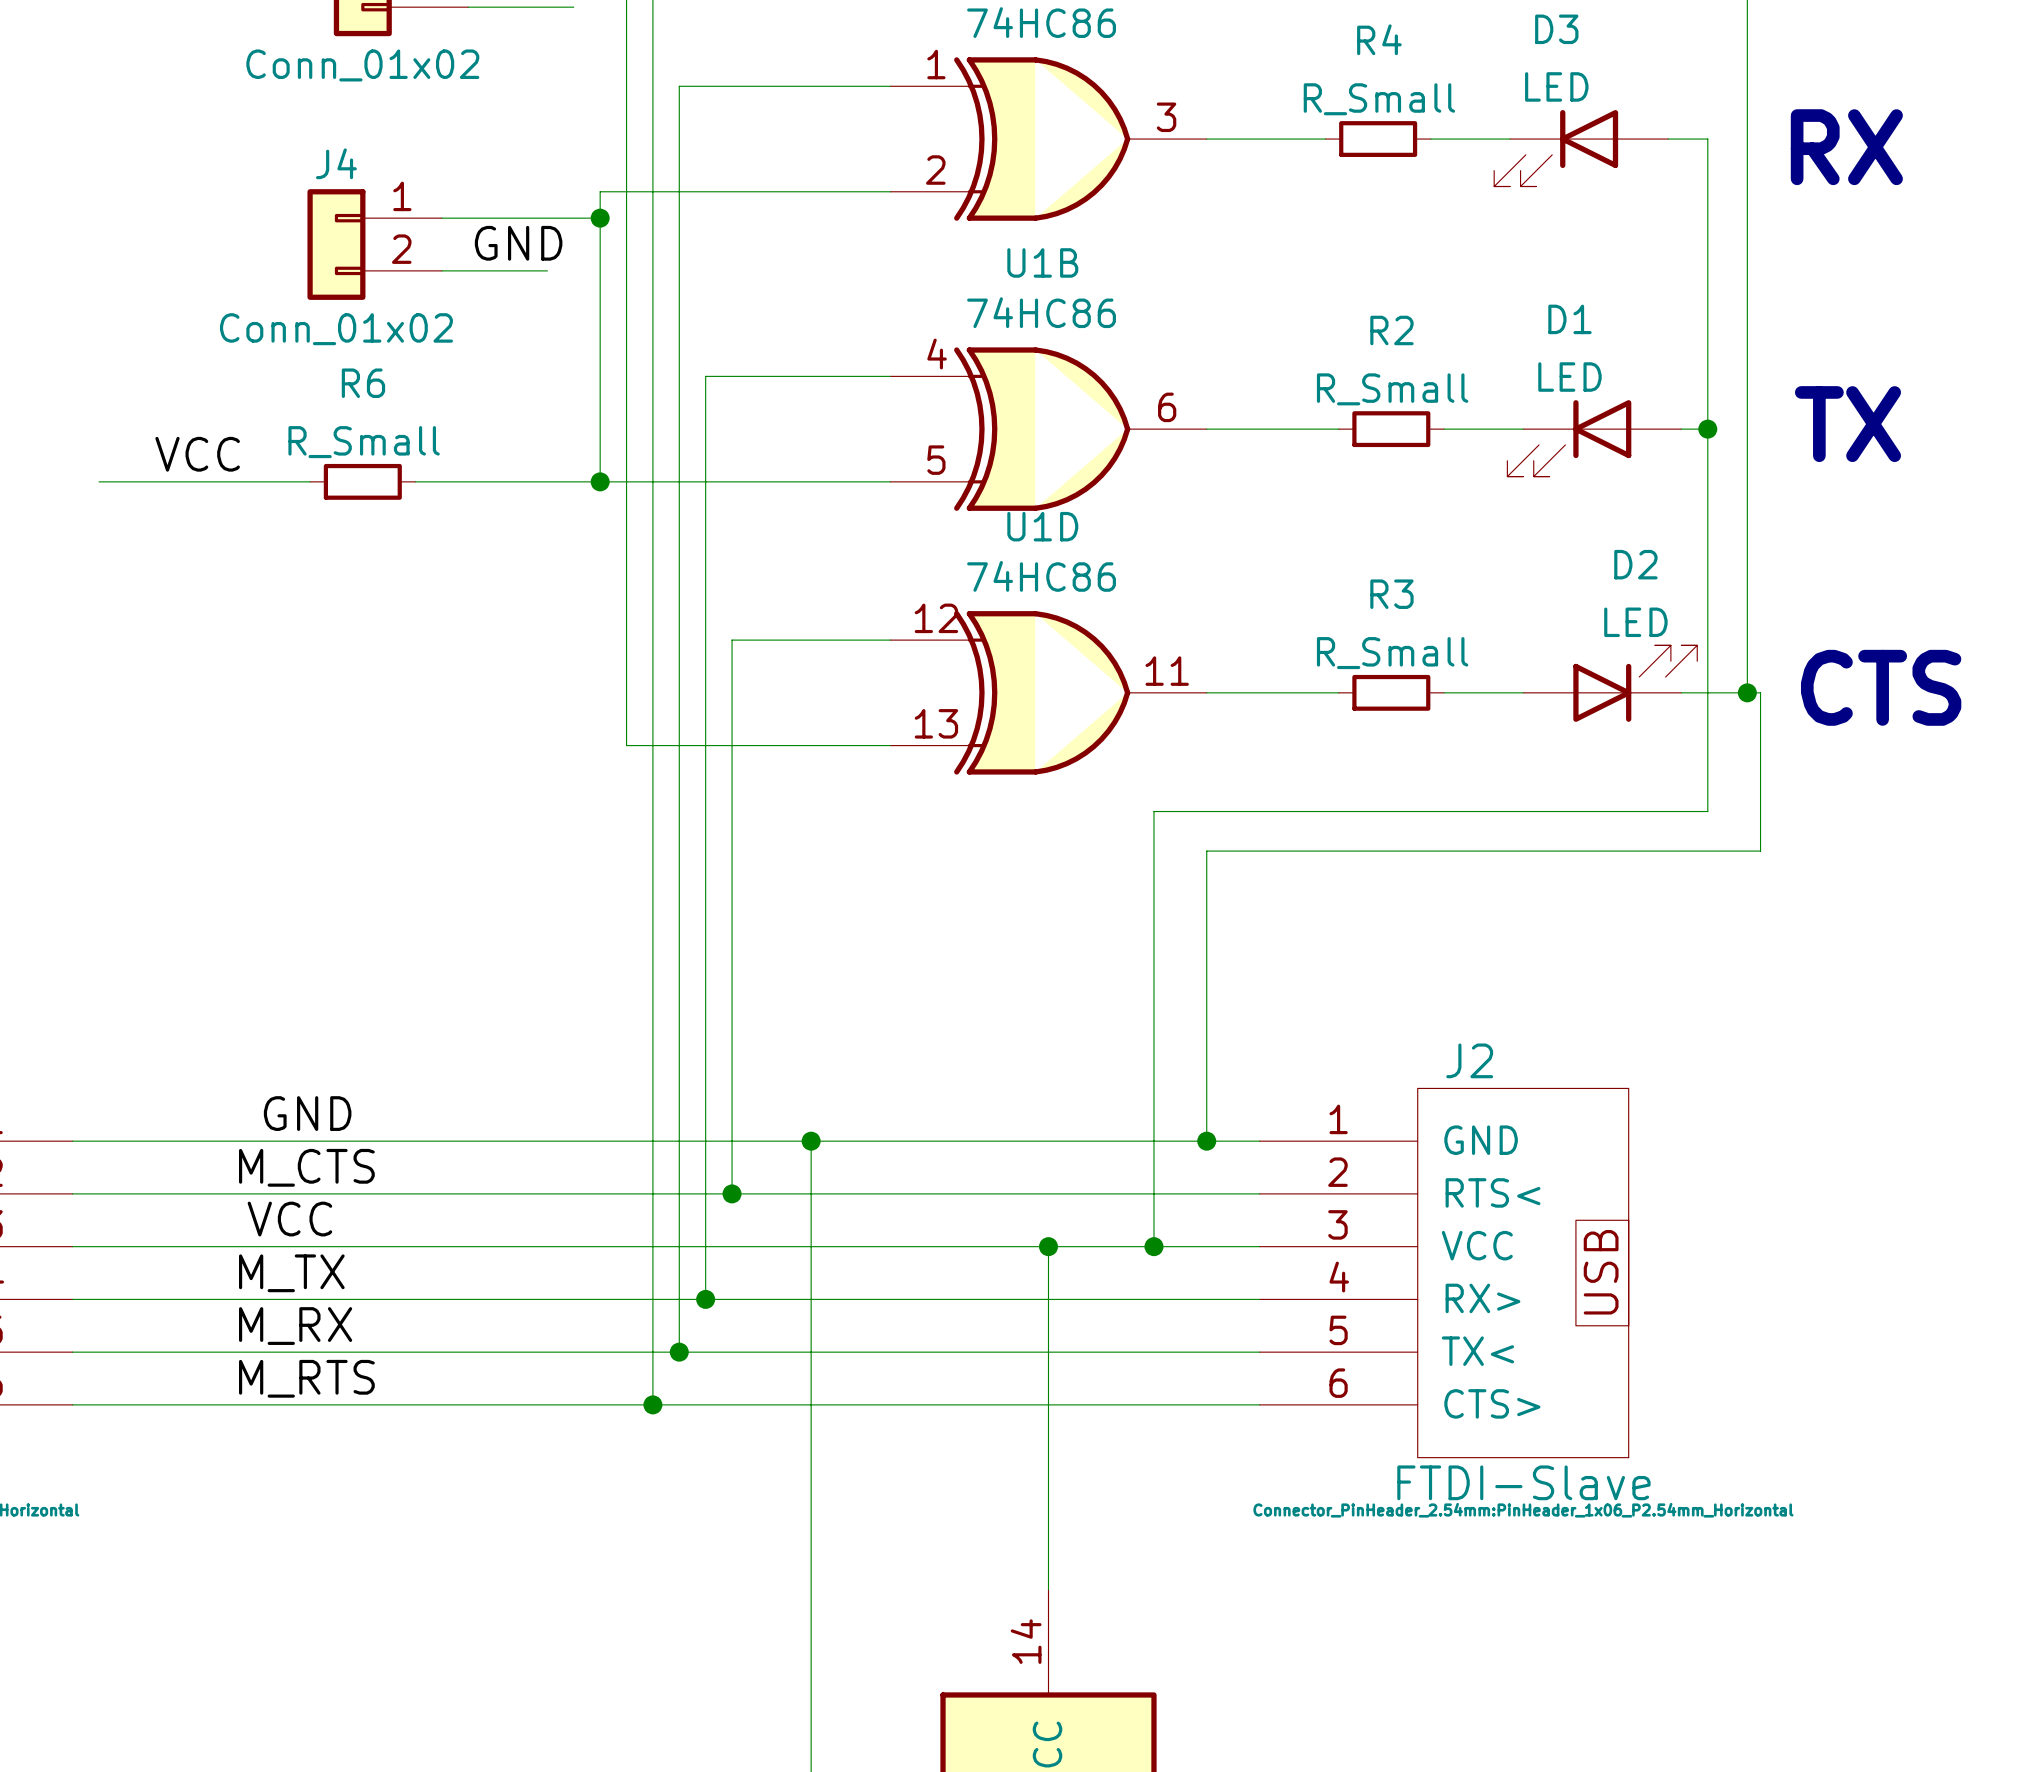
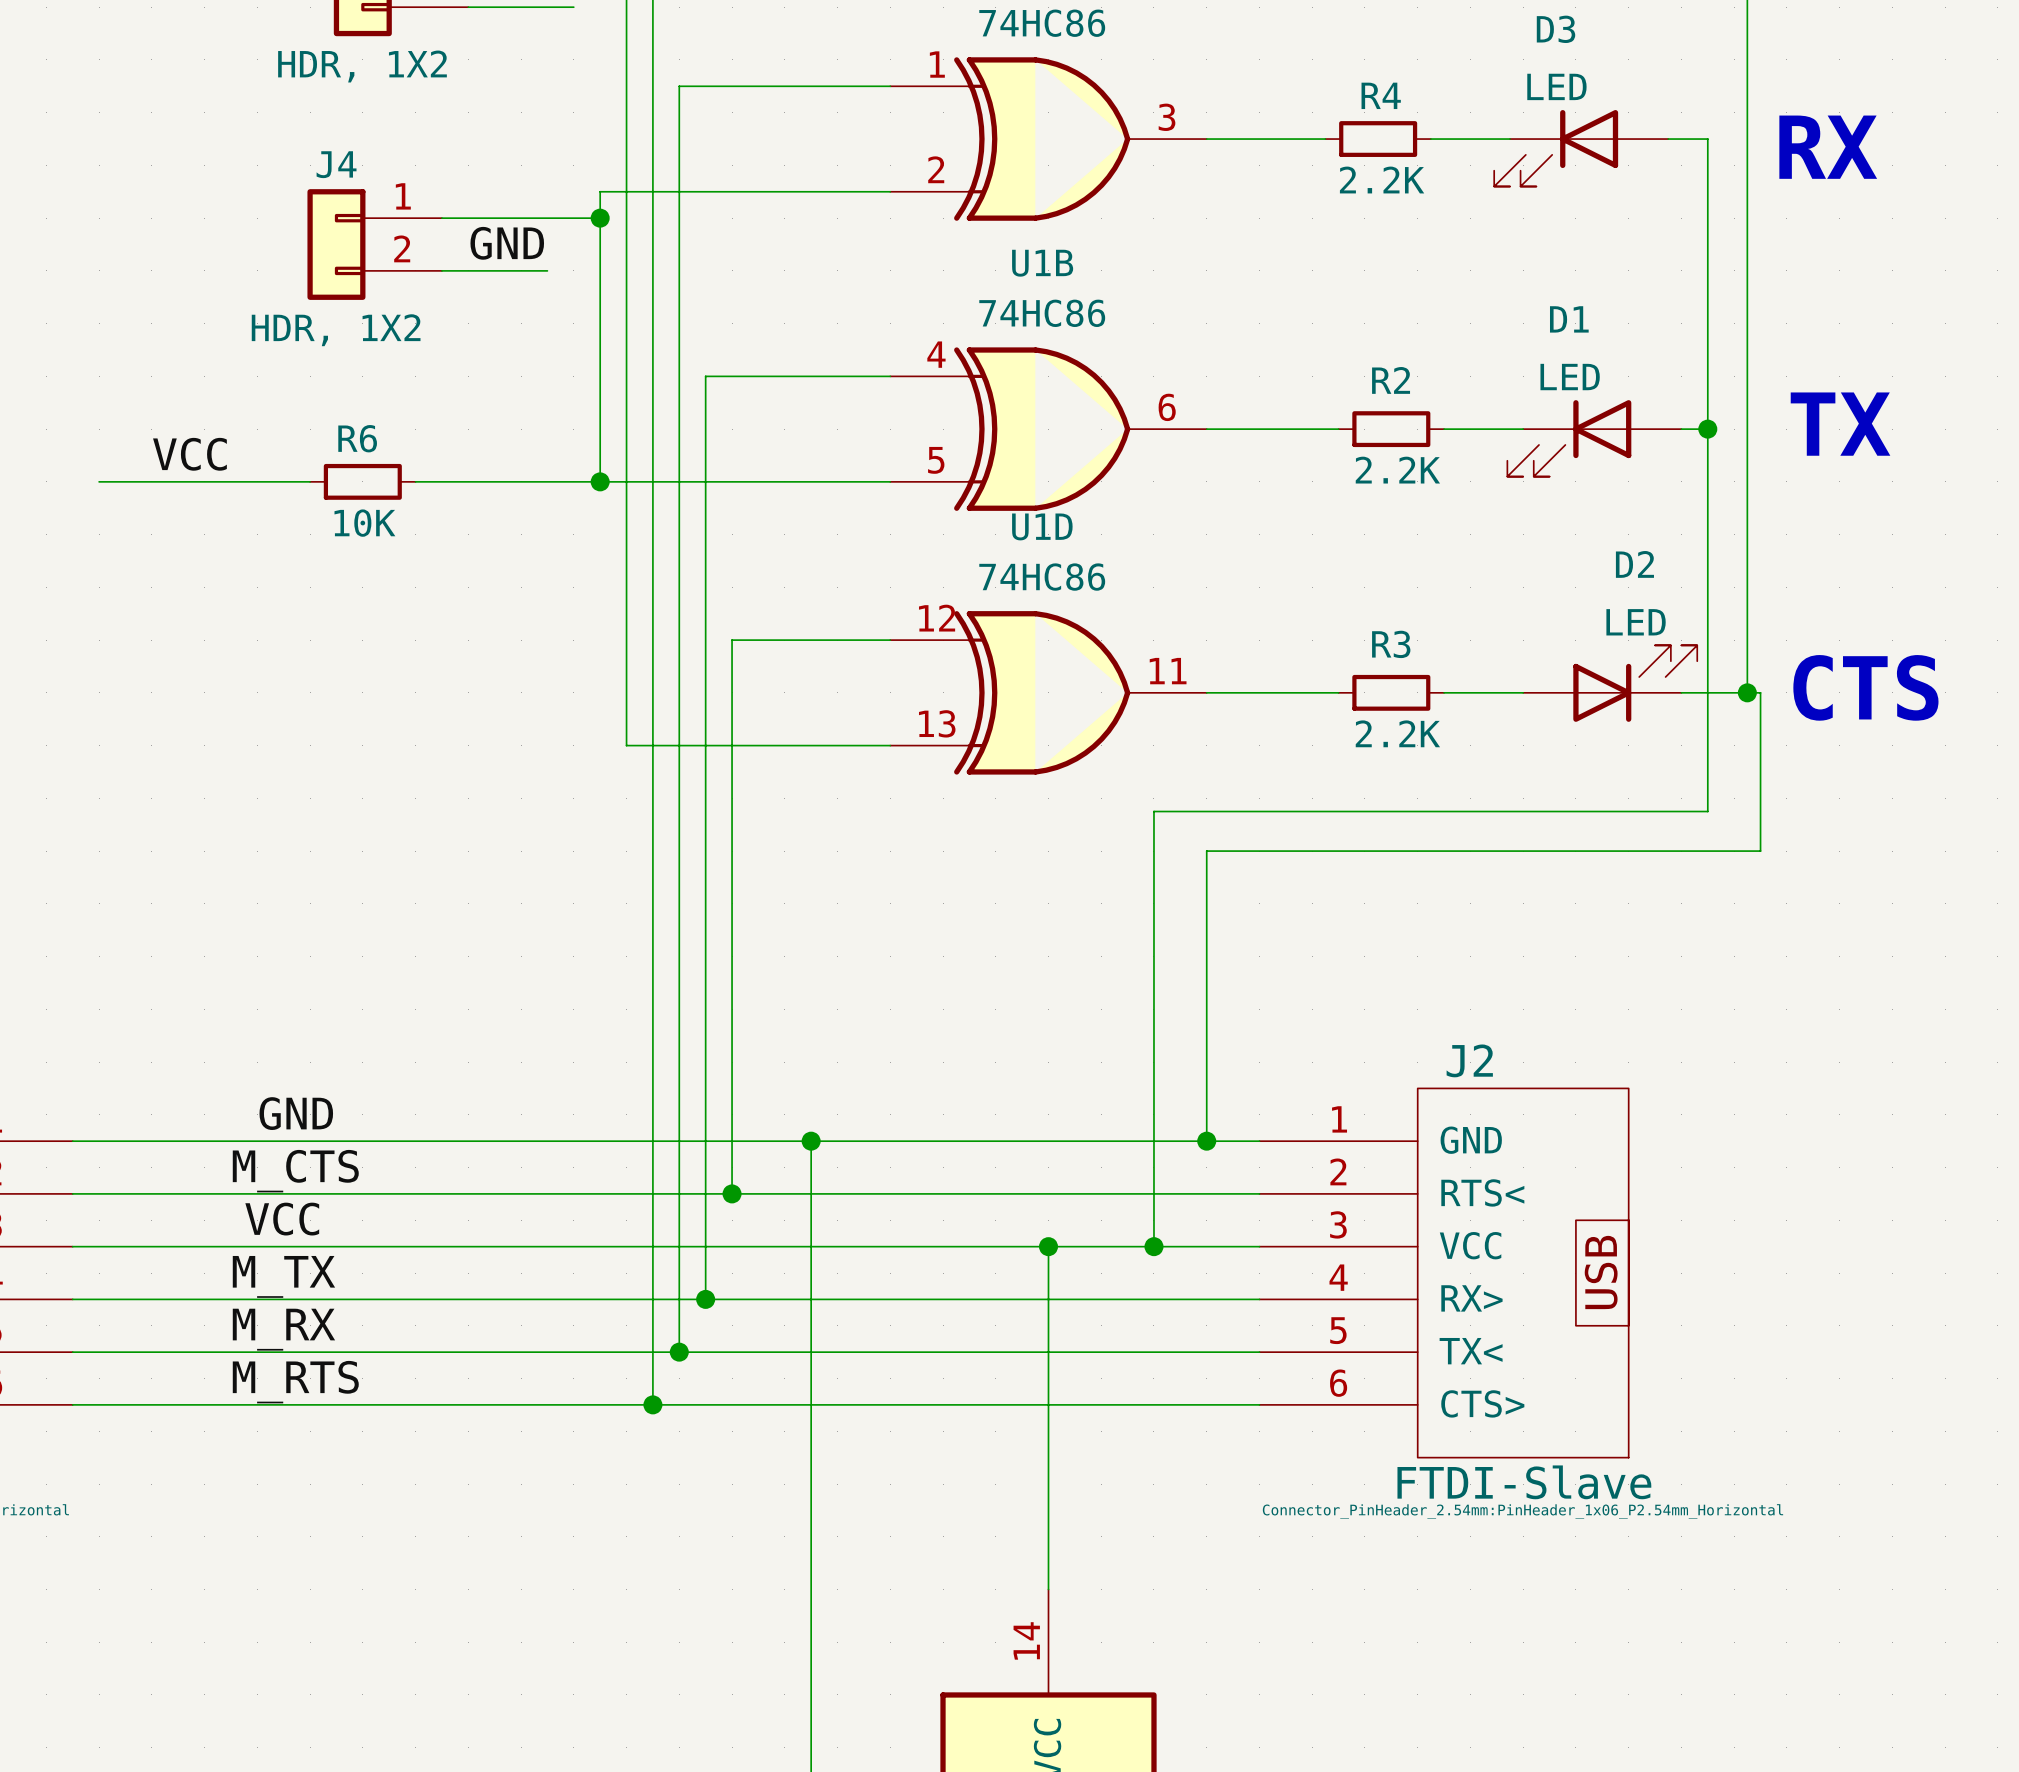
R4 name position: R4 (1379, 39) -> R4 (1381, 95)
part value: Conn_01x02 (362, 65) -> HDR, 1X2 (362, 66)
R4 value: R_Small (1379, 99) -> 2.2K (1382, 180)
J4 value: Conn_01x02 (336, 329) -> HDR, 1X2 (336, 330)
R2 name position: R2 (1391, 330) -> R2 (1391, 380)
R6 name position: R6 (363, 383) -> R6 (357, 438)
R2 value: R_Small (1392, 389) -> 2.2K (1397, 470)
R6 value: R_Small (364, 442) -> 10K (364, 523)
R3 name position: R3 (1391, 594) -> R3 (1391, 644)
R3 value: R_Small (1392, 653) -> 2.2K (1397, 733)

